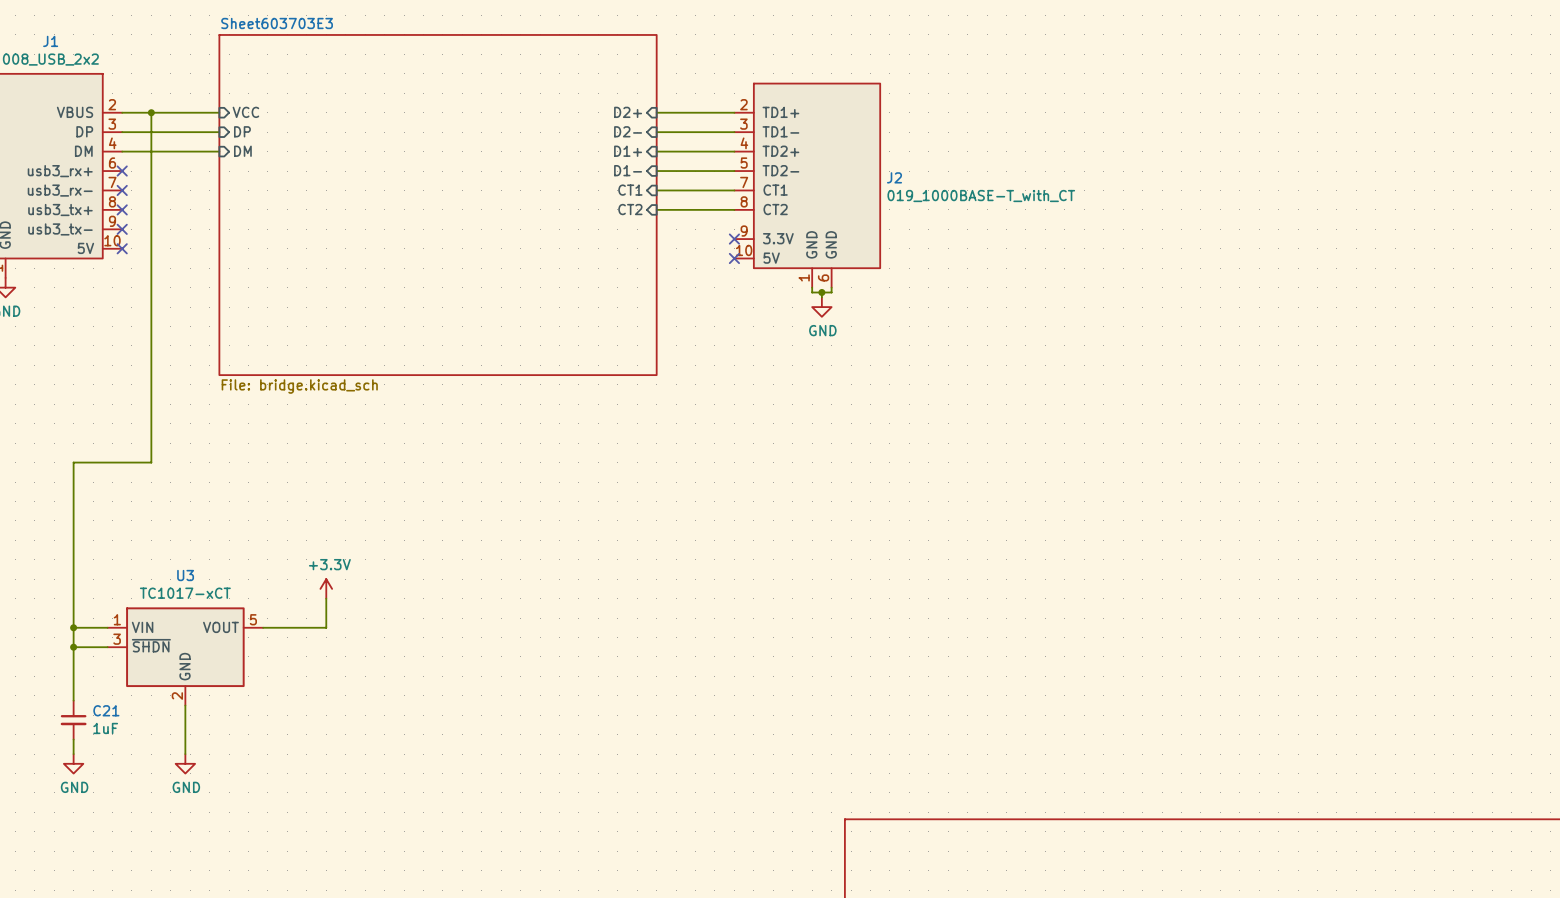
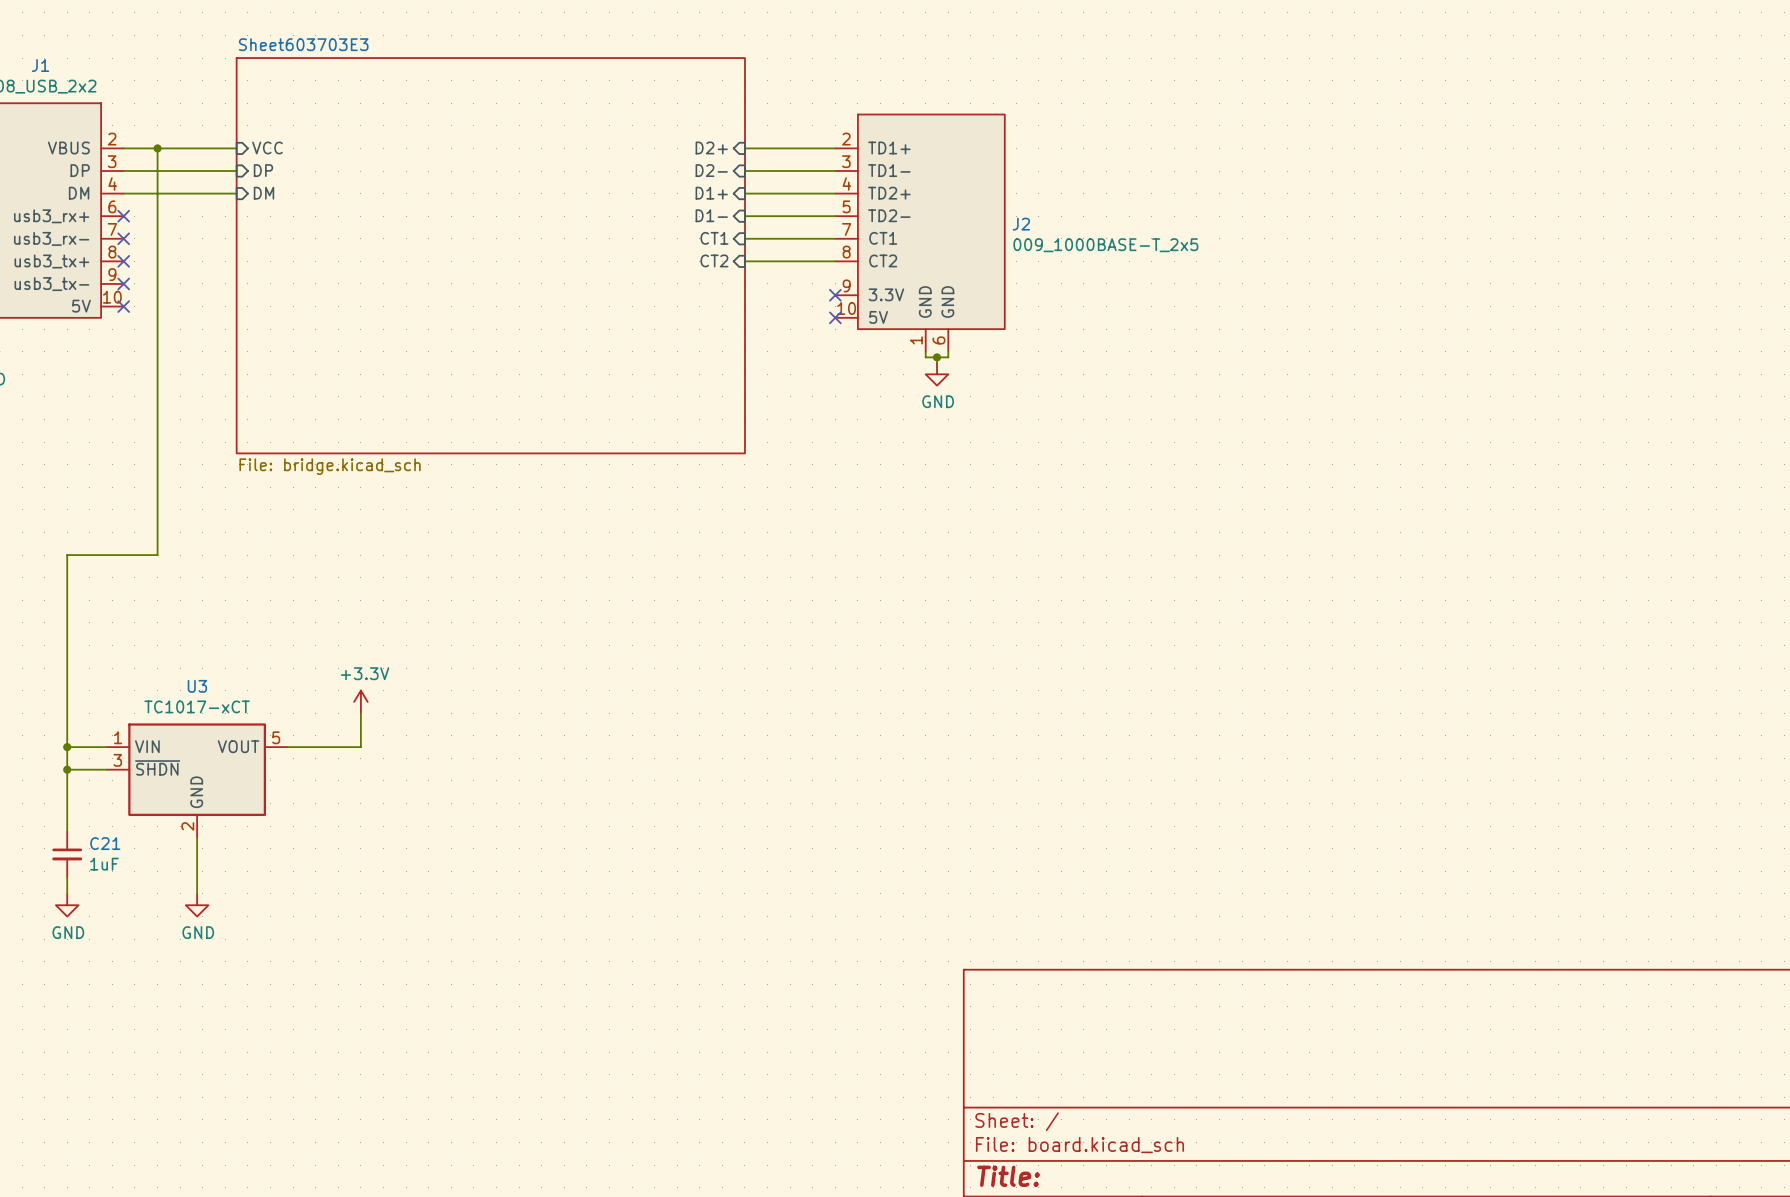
J2 value: 019_1000BASE-T_with_CT (981, 196) -> 009_1000BASE-T_2x5 (1105, 245)

